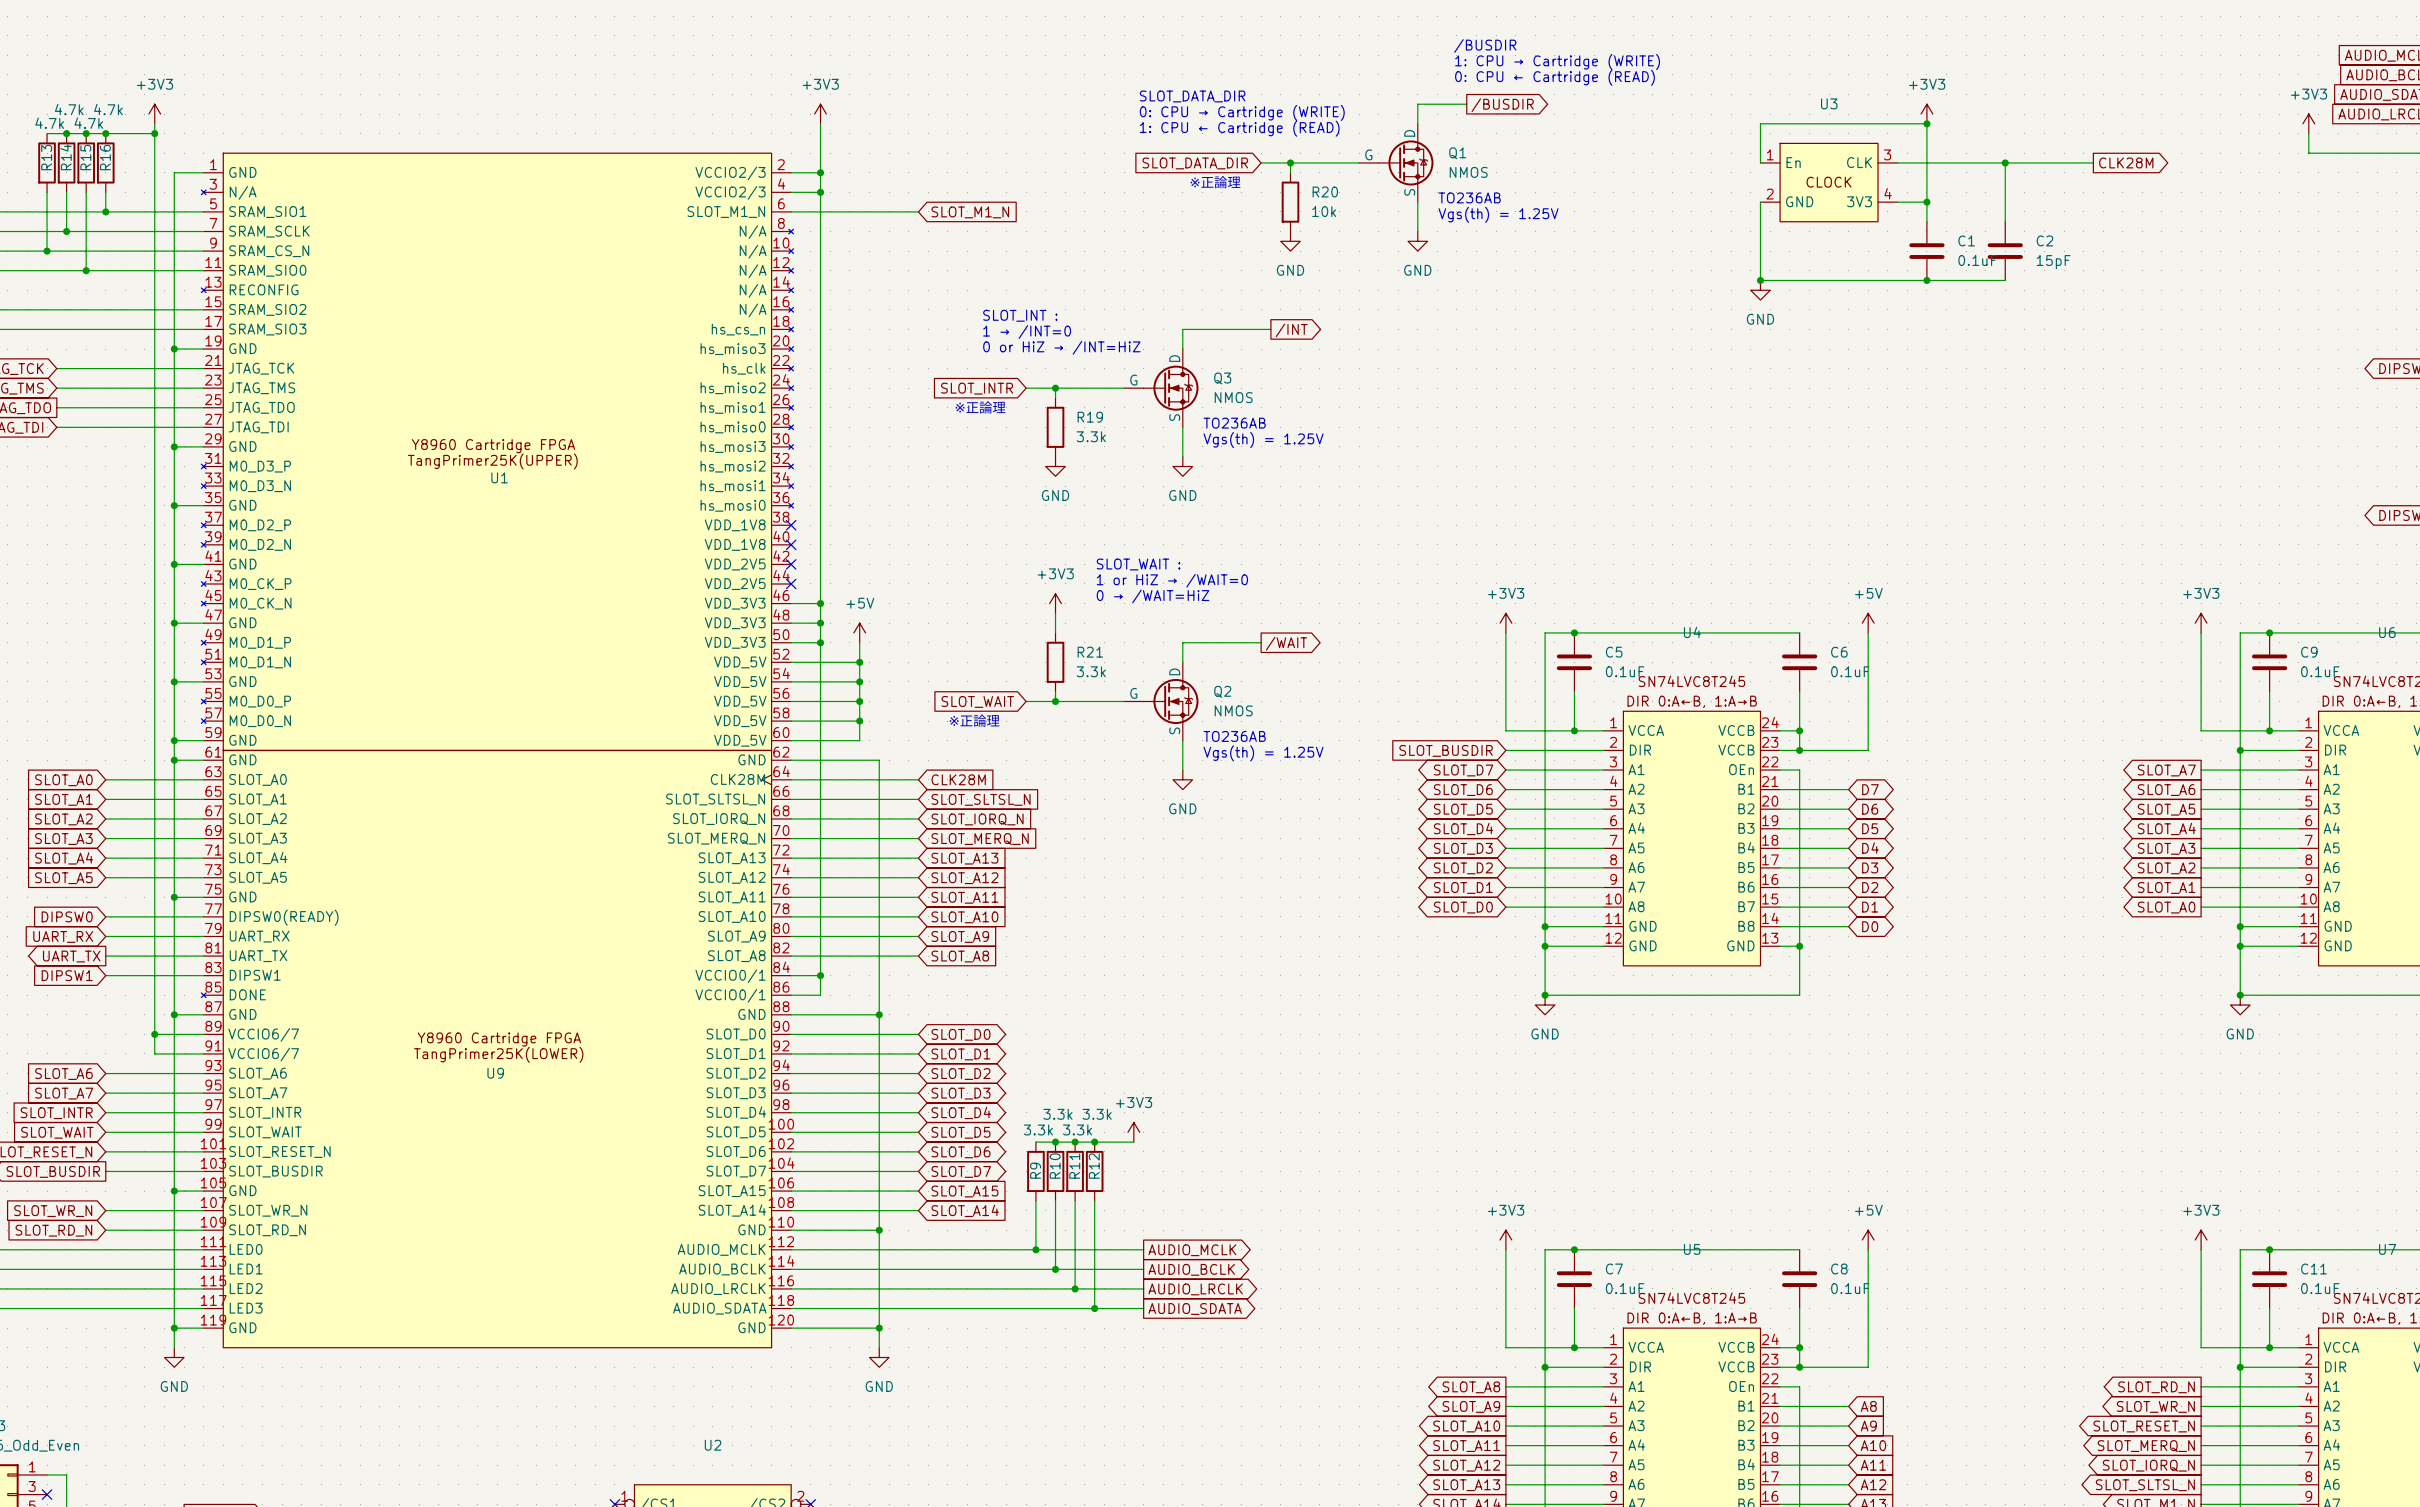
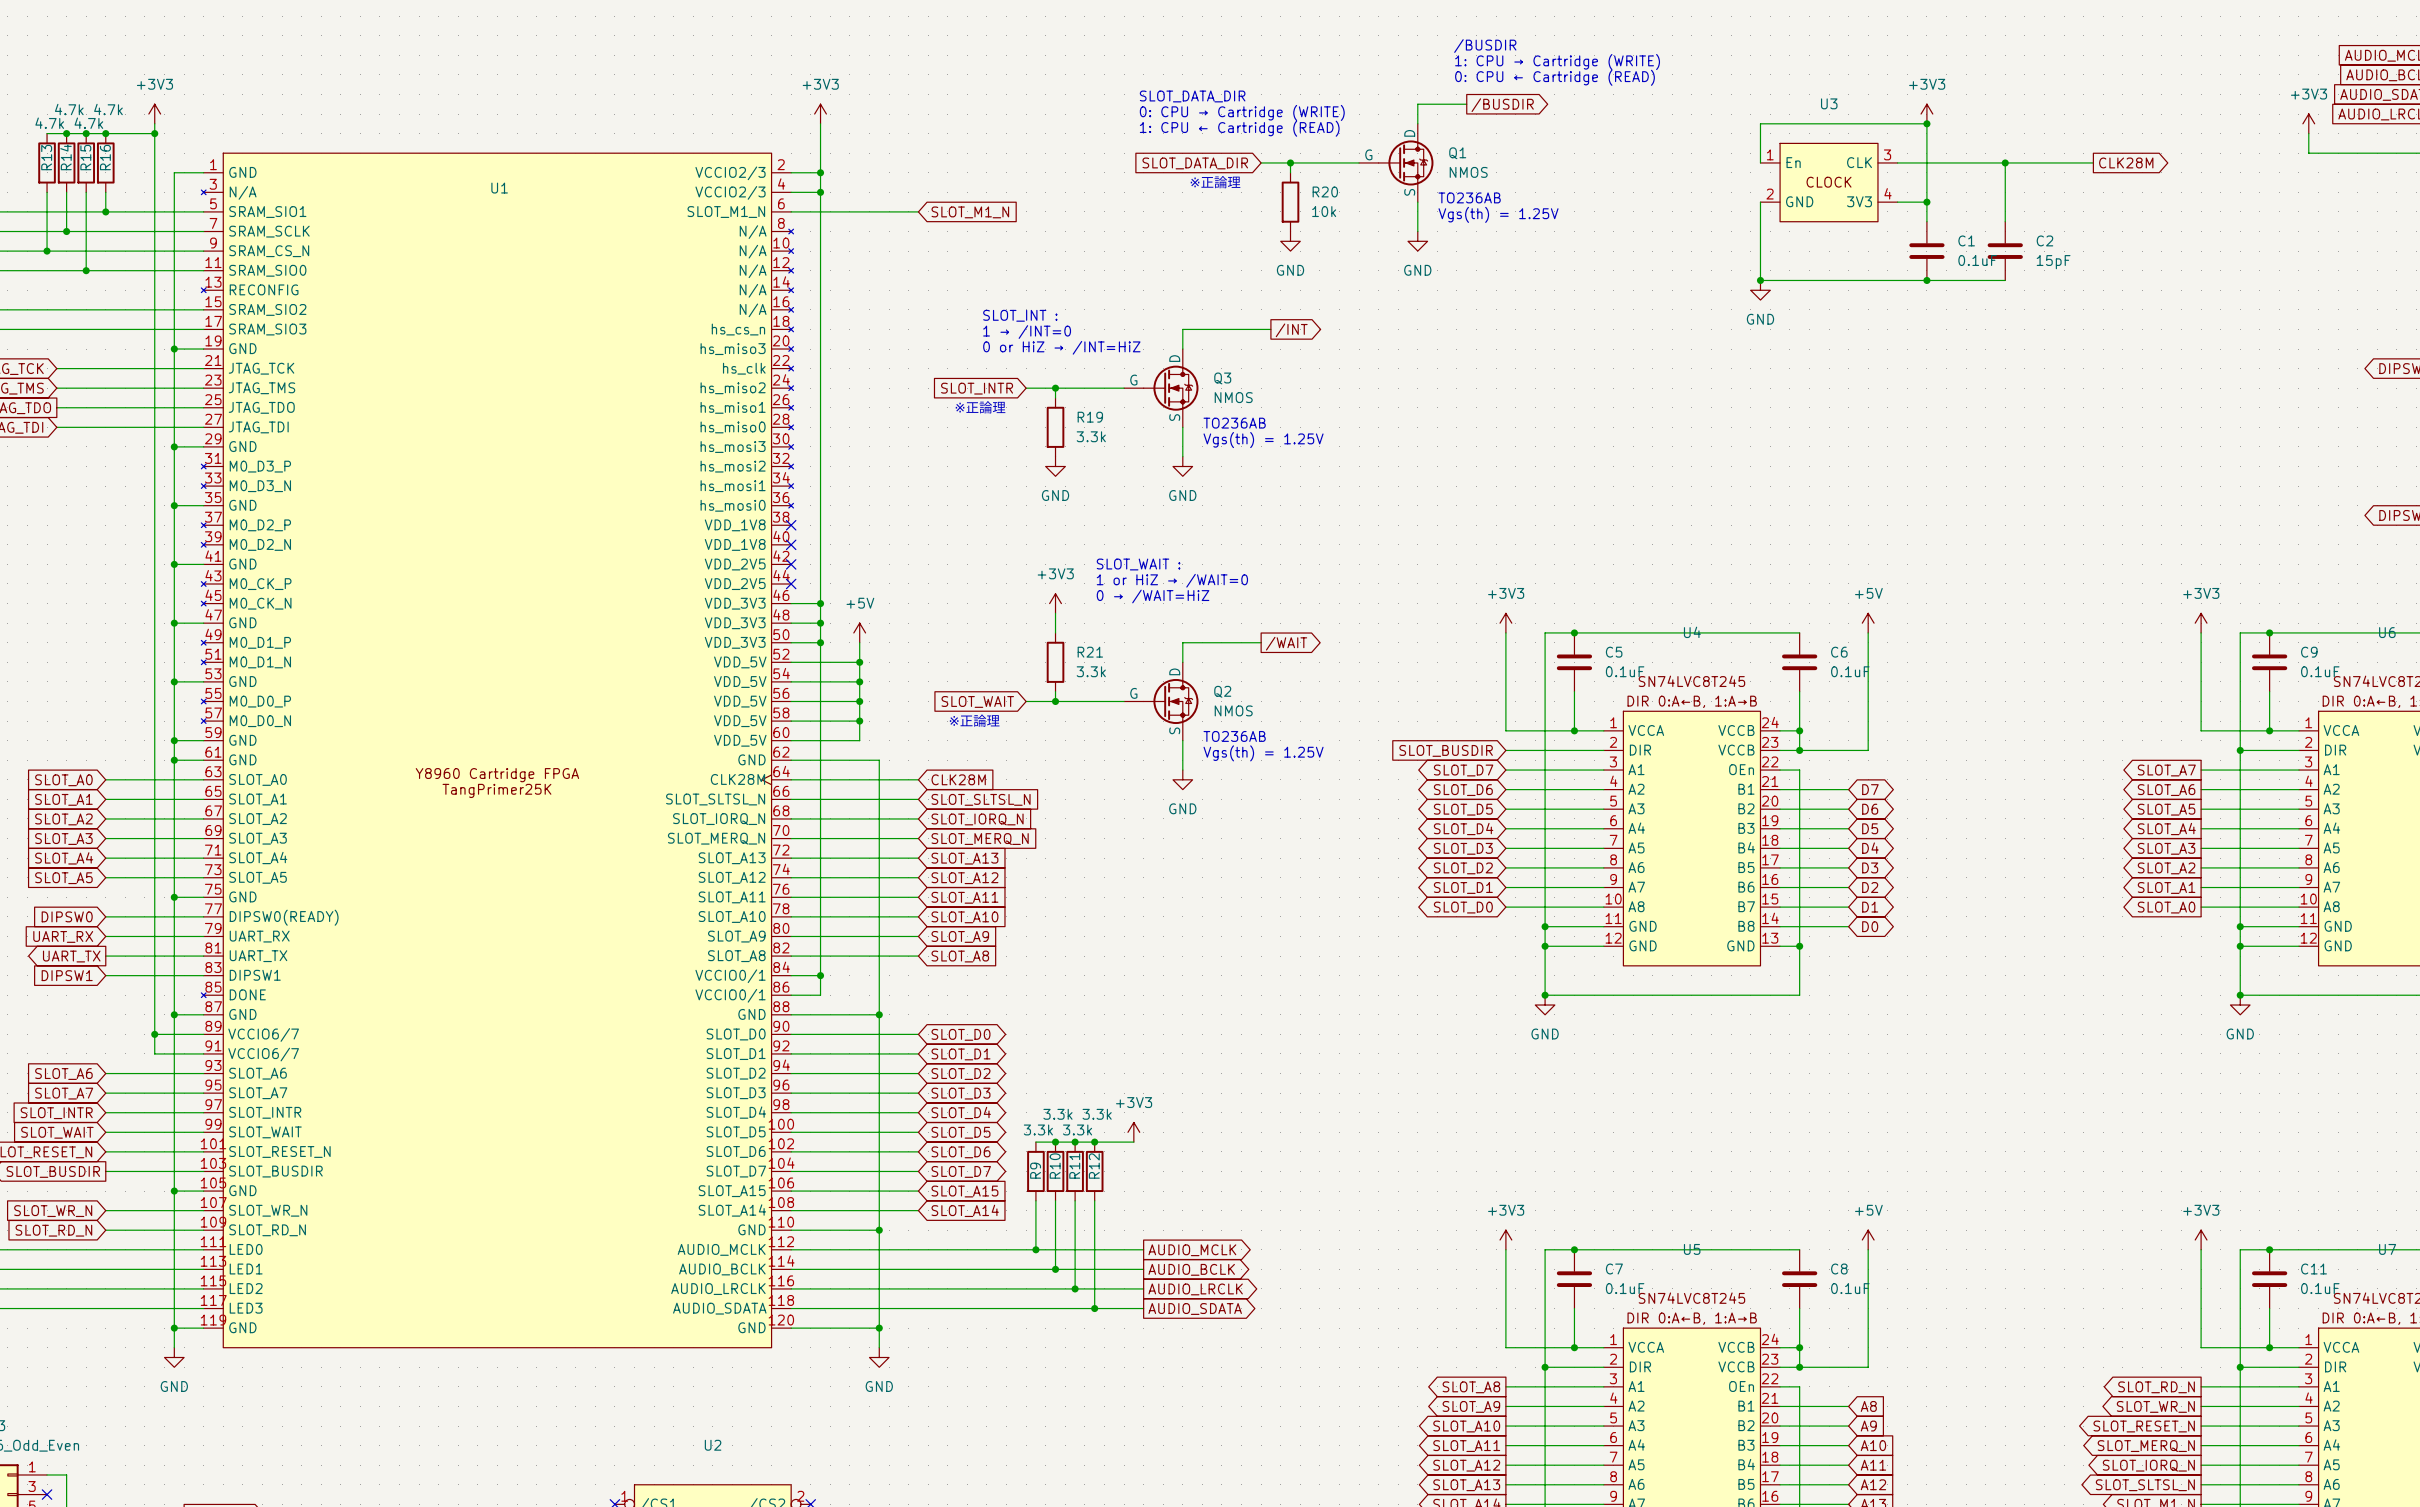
U1 symbol: [201, 152, 794, 751] -> [201, 152, 794, 1349]
U1 name position: U1 (499, 477) -> U1 (499, 188)
U9: (496, 1049) -> none

